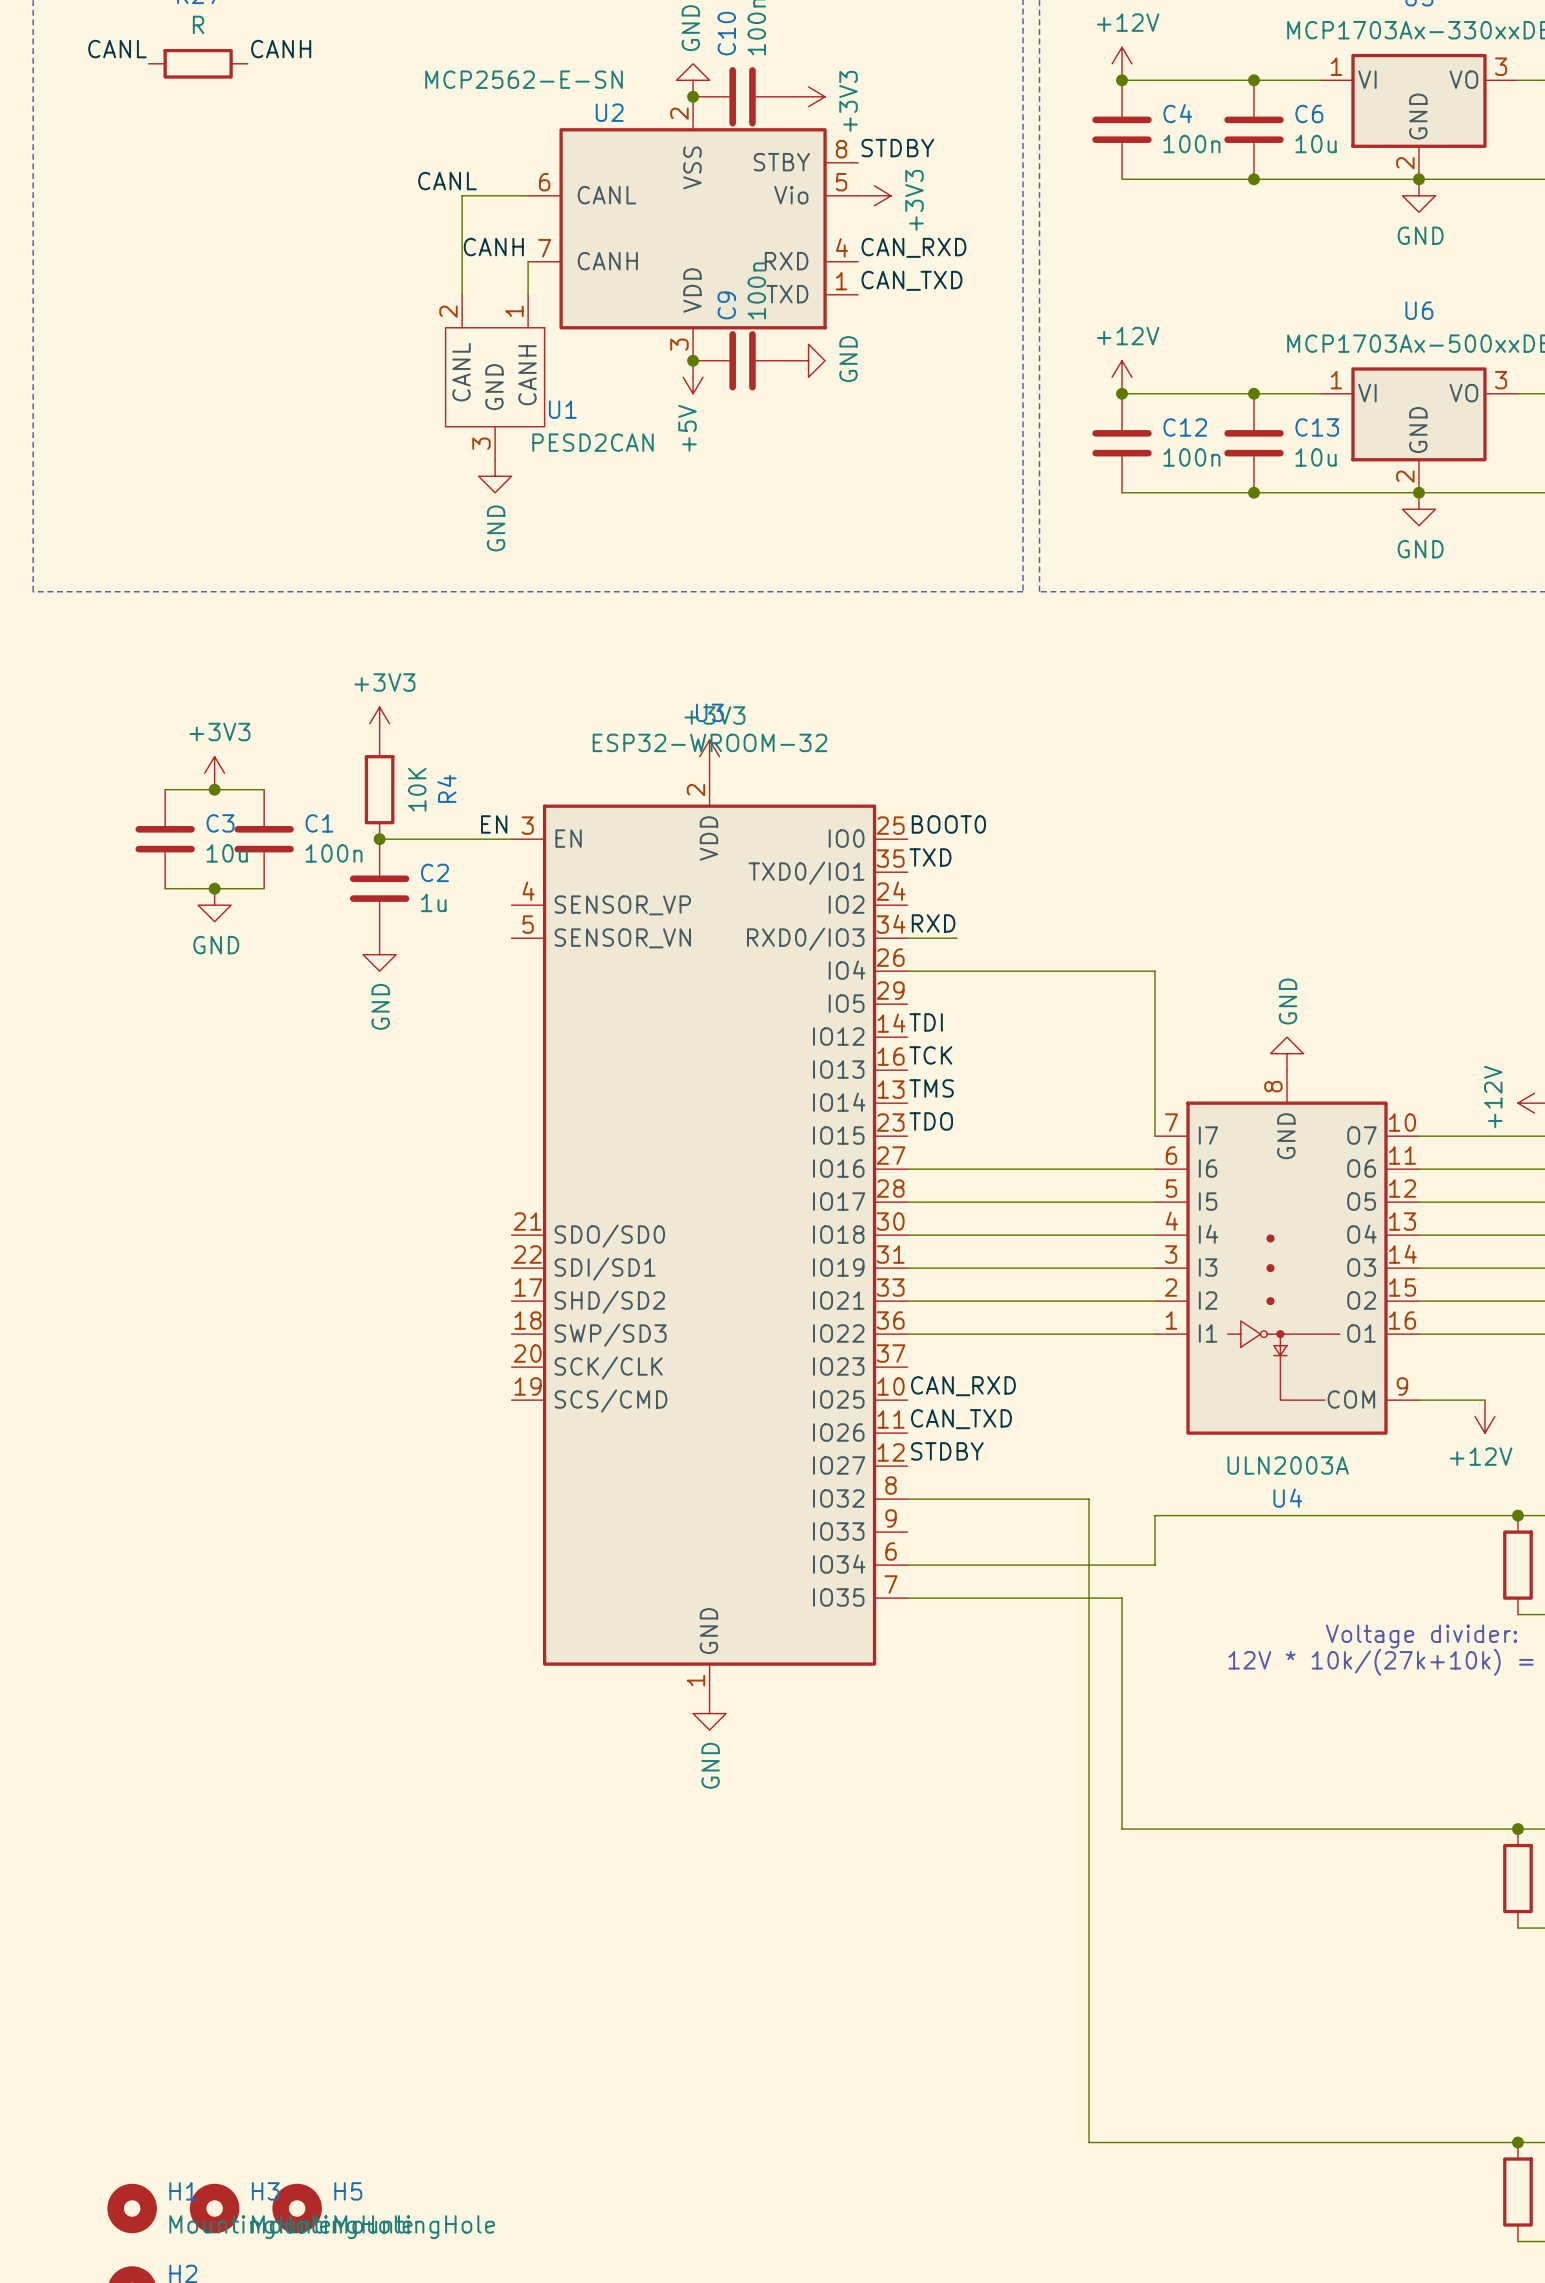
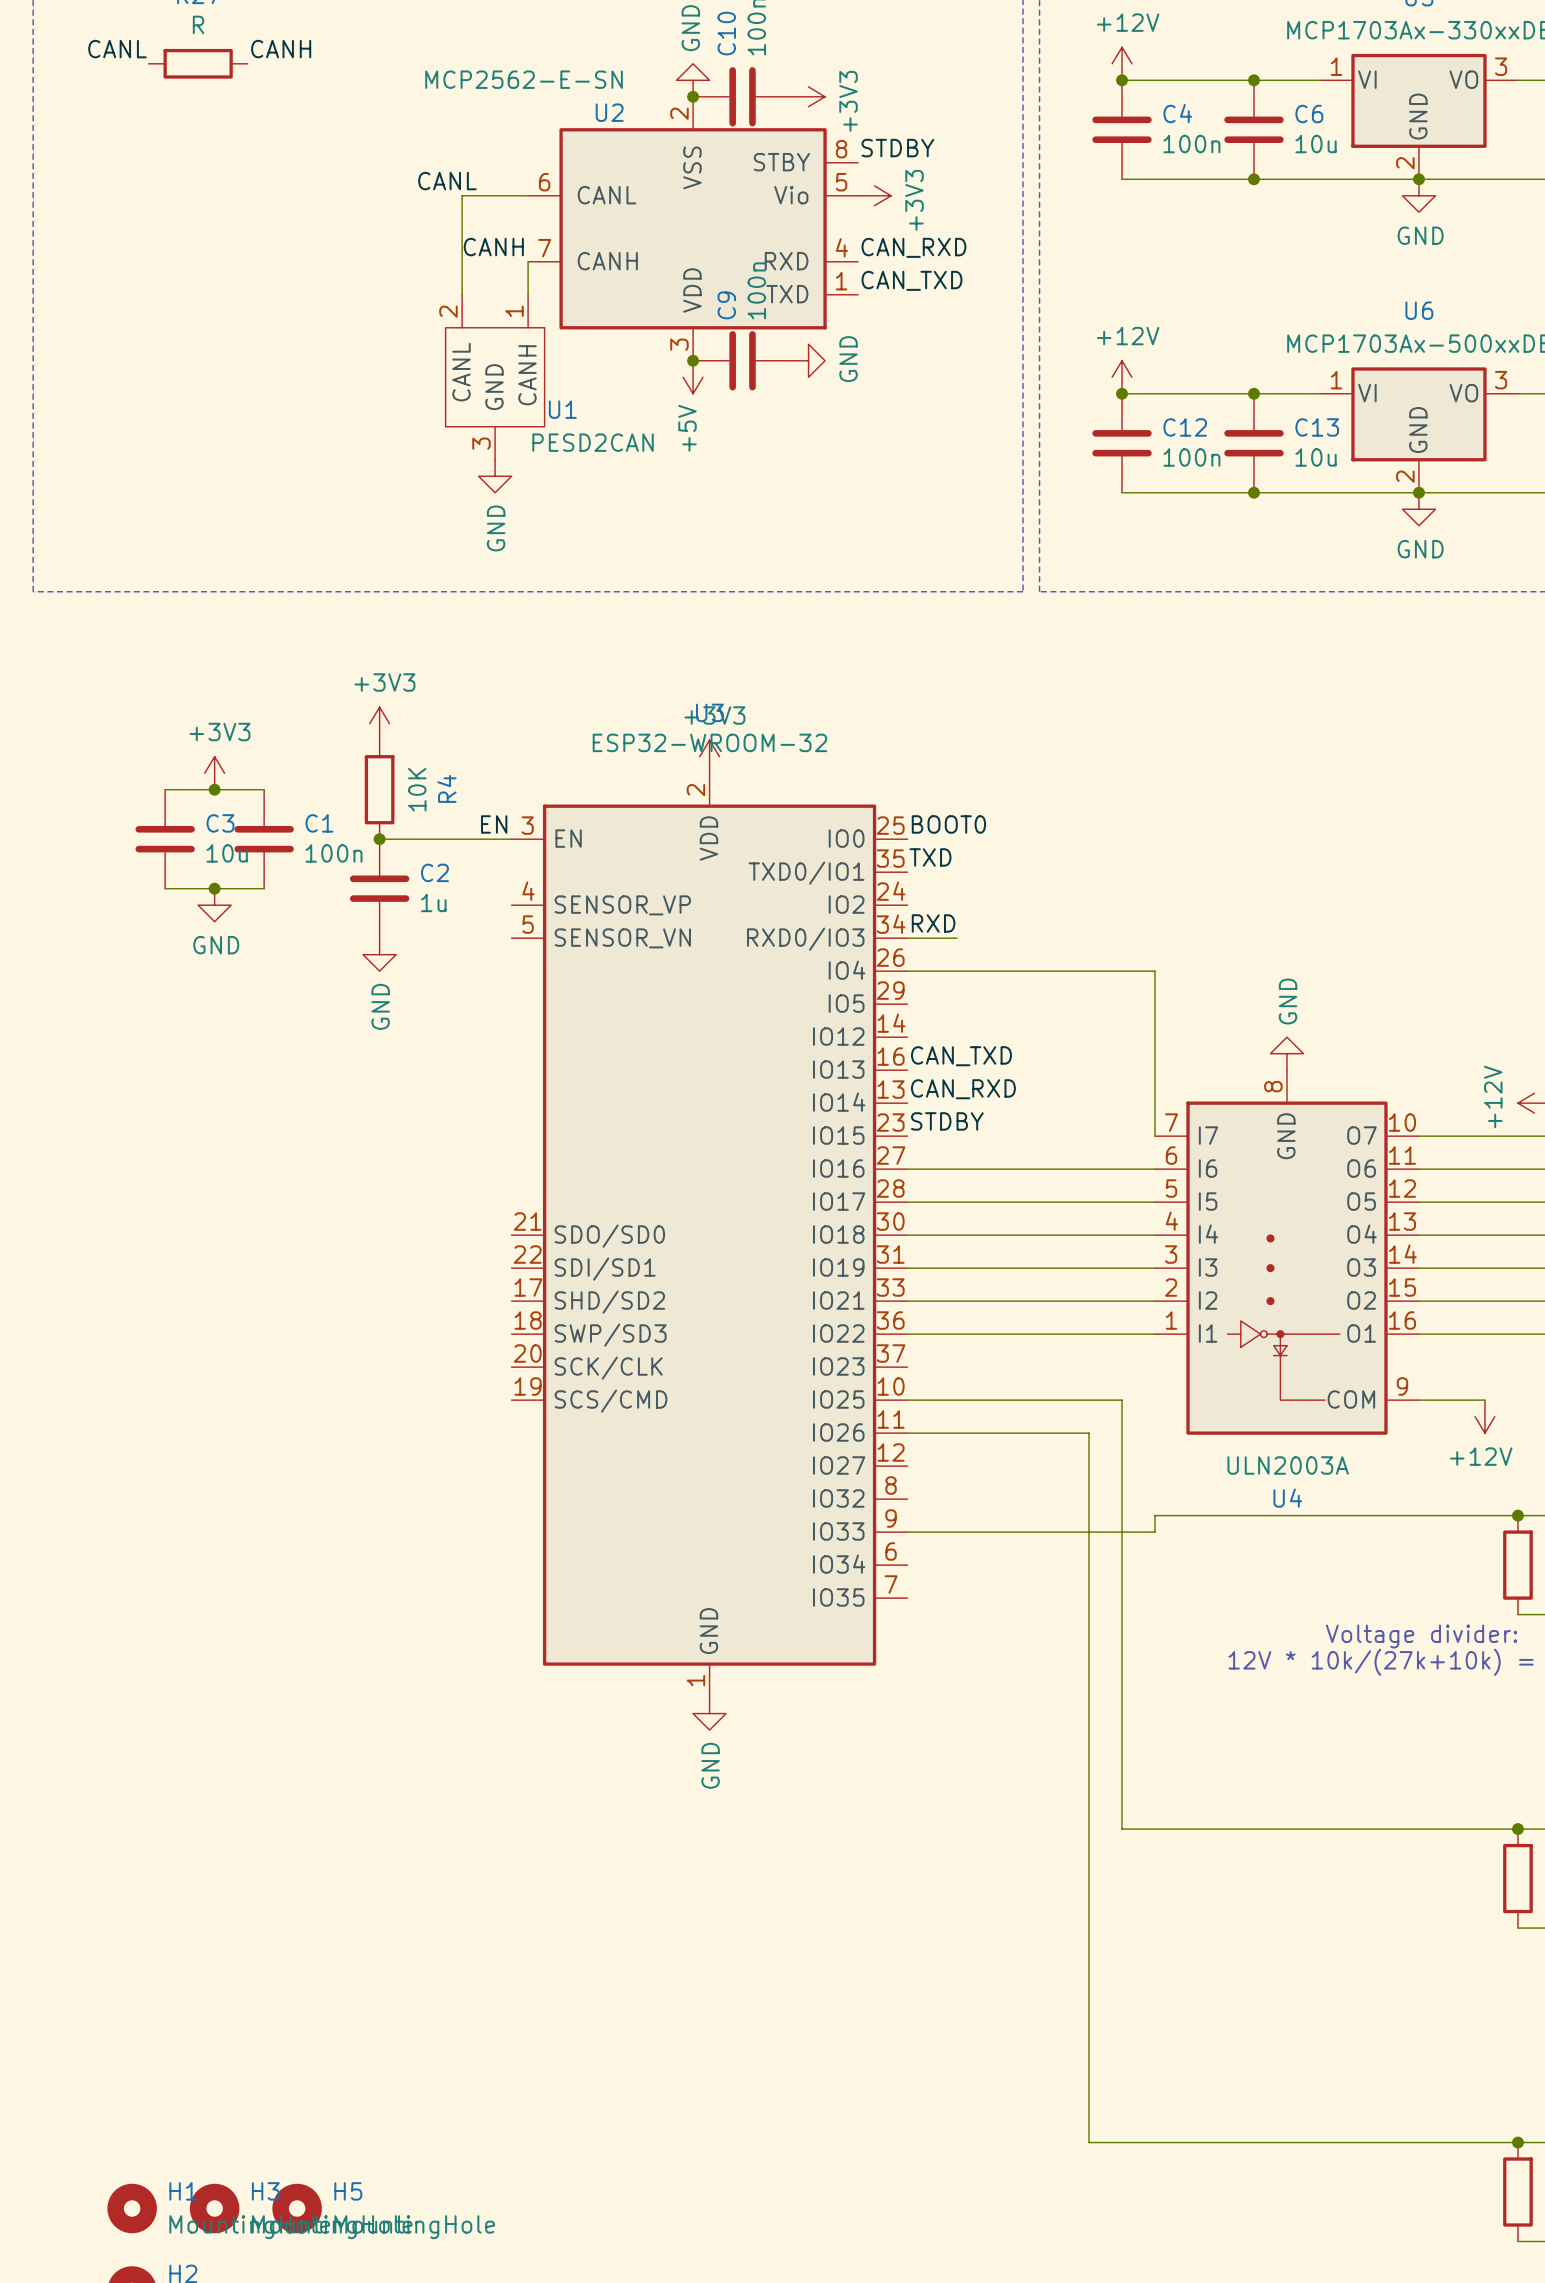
label: TDI (926, 1022) -> none
label: TCK (930, 1055) -> CAN_TXD (961, 1056)
label: TMS (931, 1088) -> CAN_RXD (963, 1089)
label: TDO (931, 1121) -> STDBY (947, 1121)
label: CAN_RXD (963, 1386) -> none
label: CAN_TXD (961, 1419) -> none
label: STDBY (947, 1451) -> none
wire: (907, 1499) (1089, 1499) -> (907, 1433) (1089, 1433) (1089, 1499)
wire: (1155, 1532) (1155, 1565) (907, 1565) -> (1155, 1532) (907, 1532)
wire: (907, 1598) (1122, 1598) -> (907, 1400) (1122, 1400) (1122, 1598)

